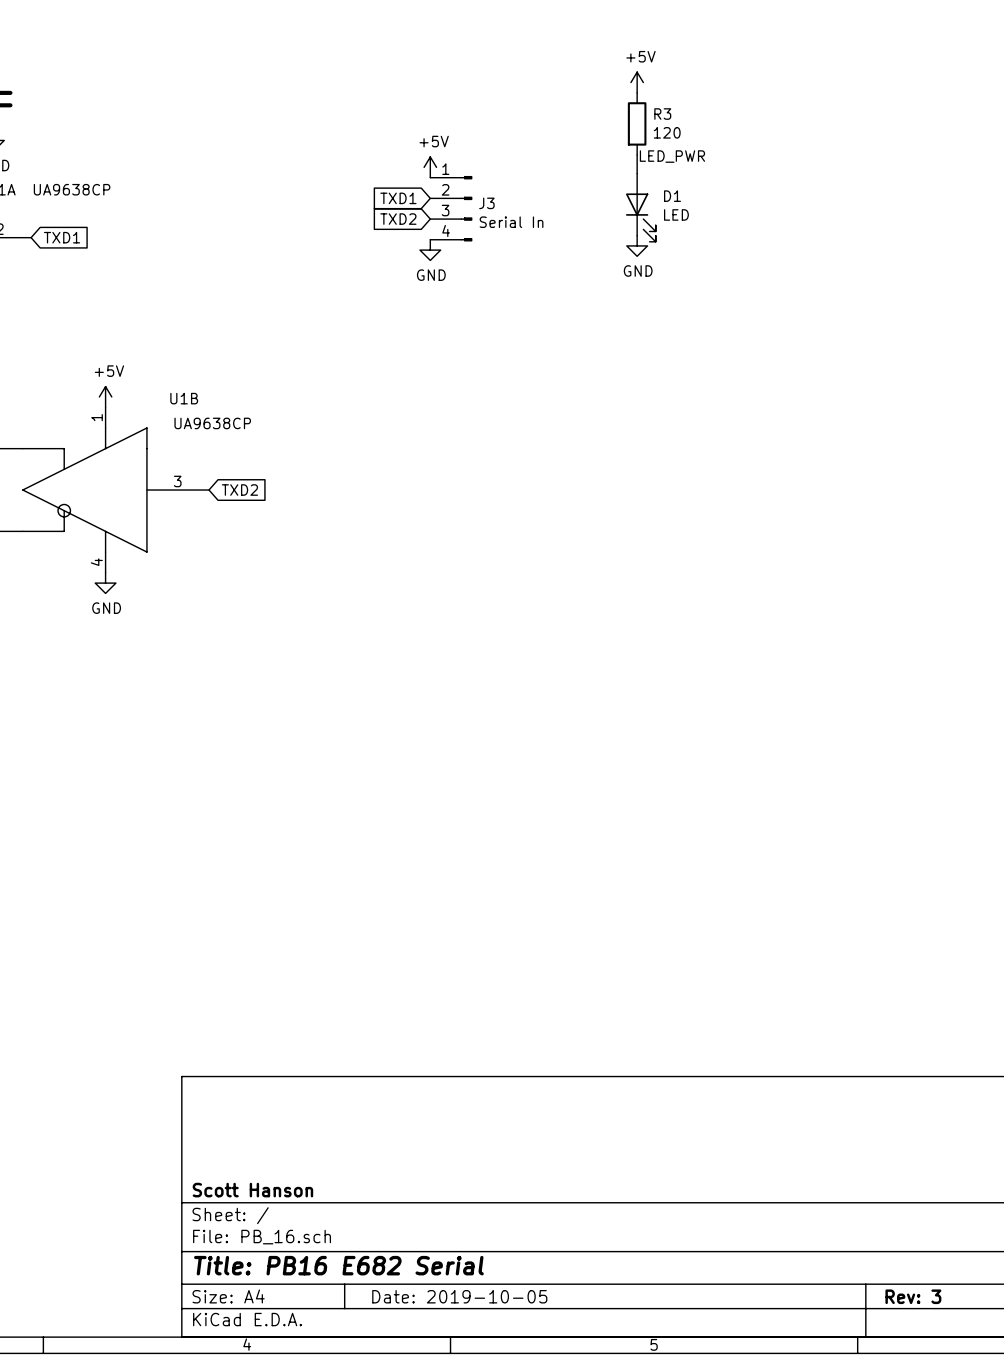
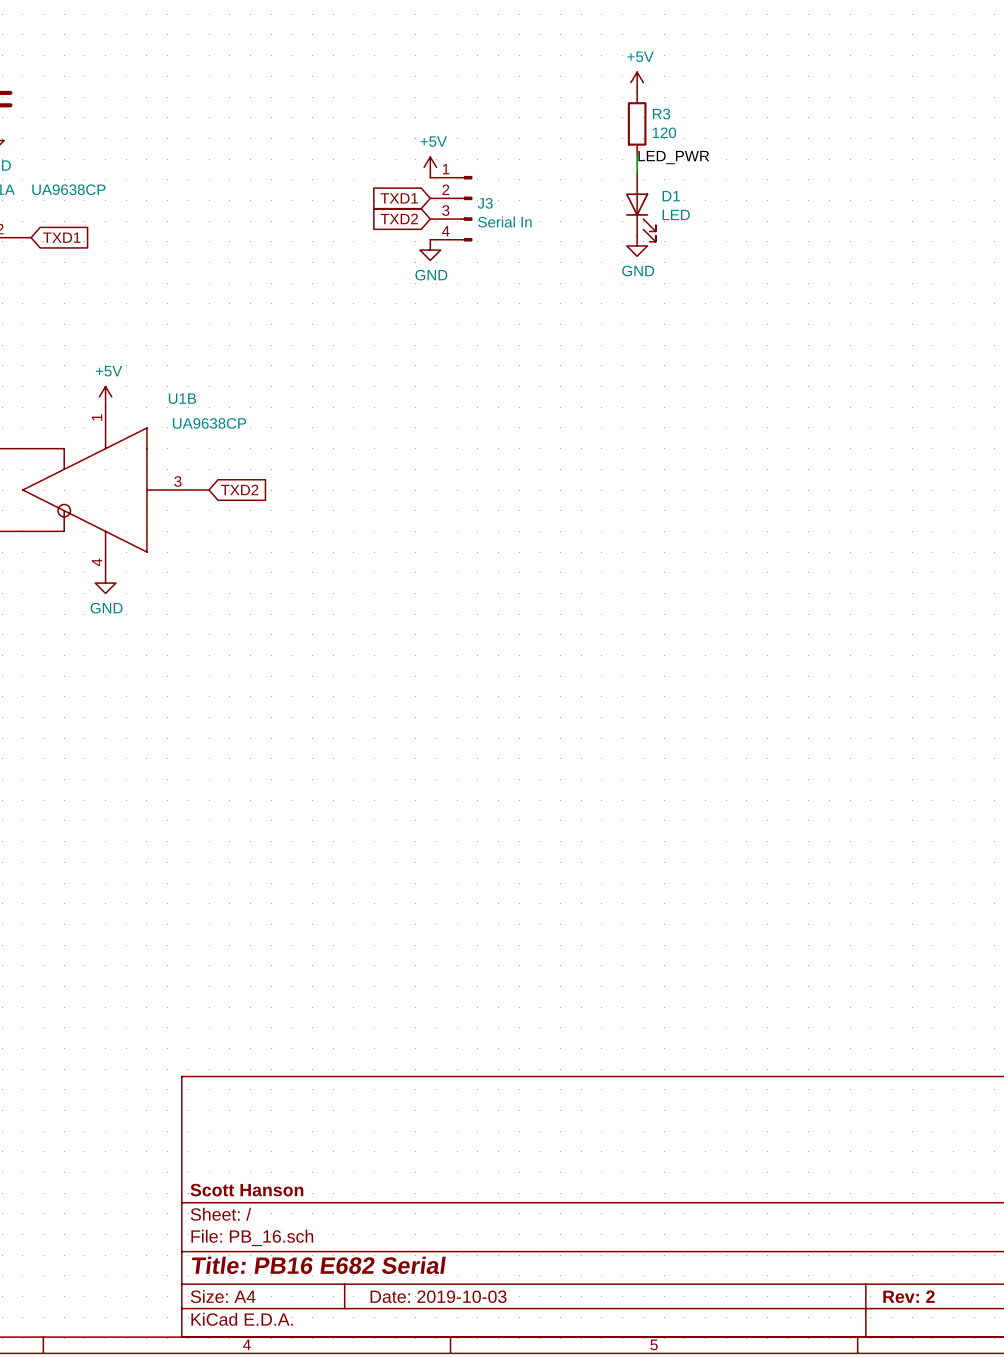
title block: Date: 2019-10-05 (459, 1296) -> Date: 2019-10-03 (438, 1296)
title block: Rev: 3 (913, 1296) -> Rev: 2 (909, 1296)

